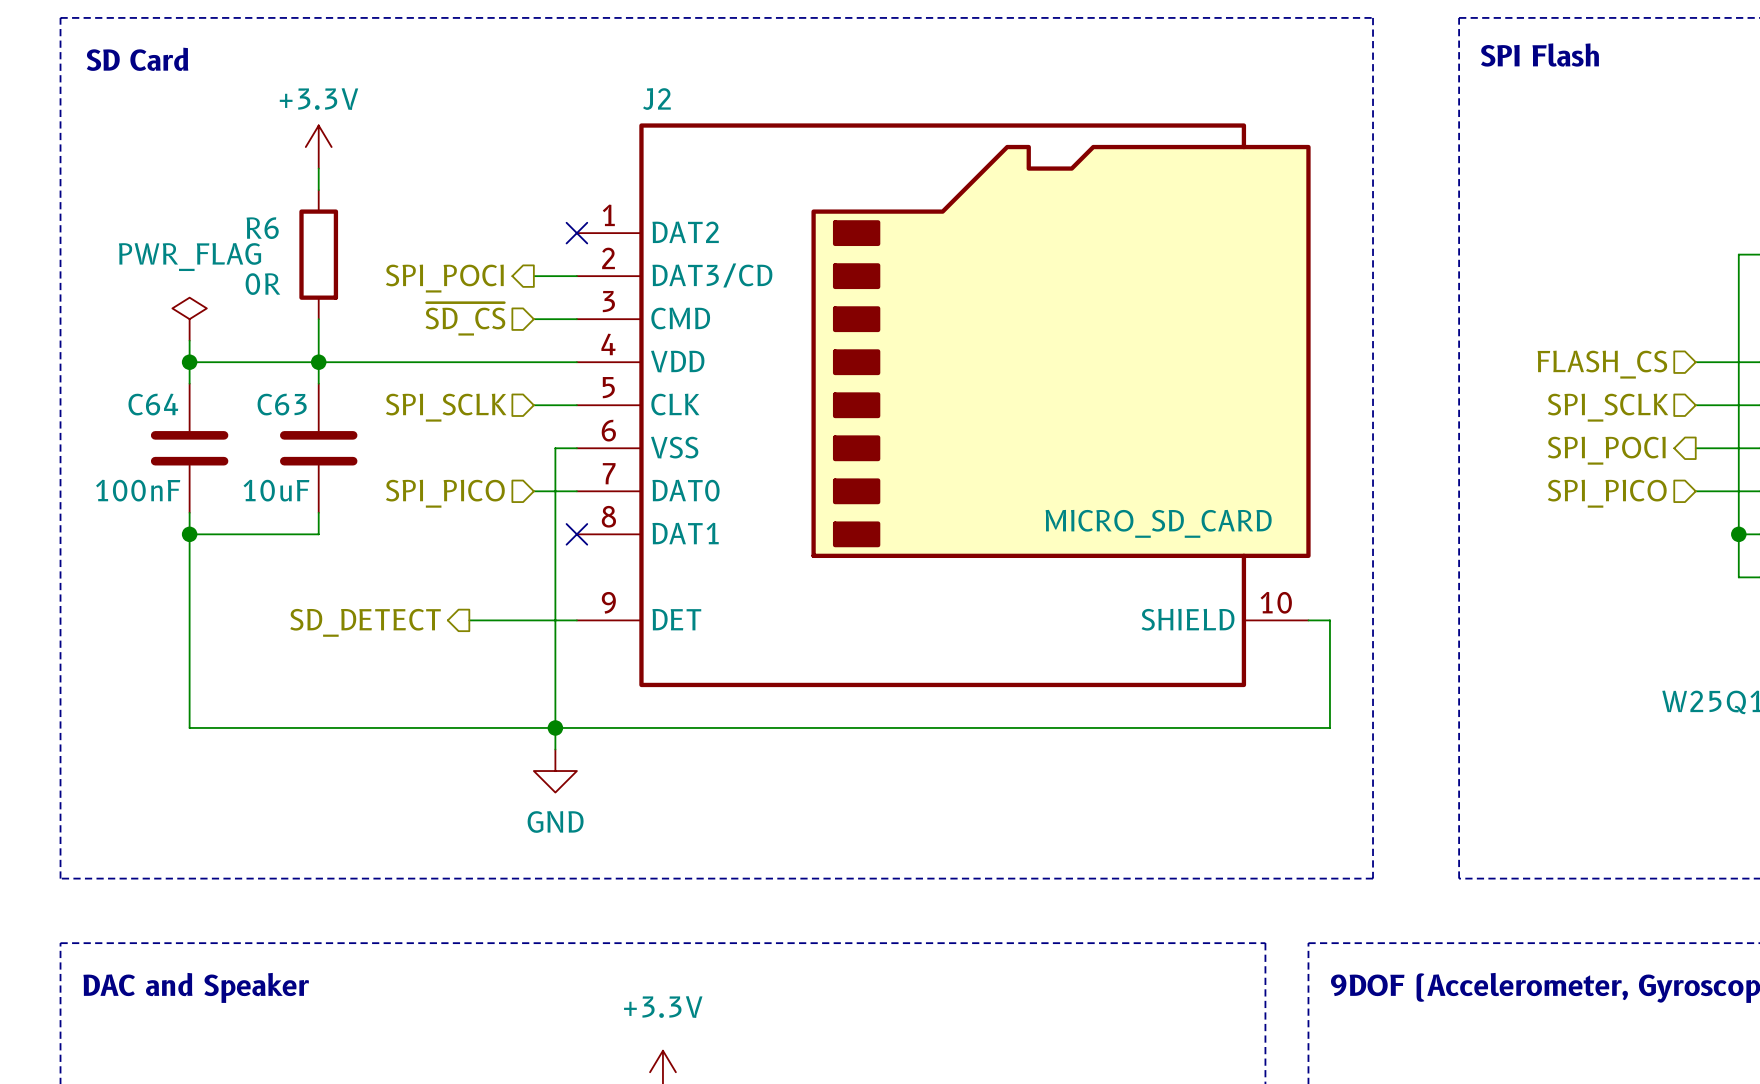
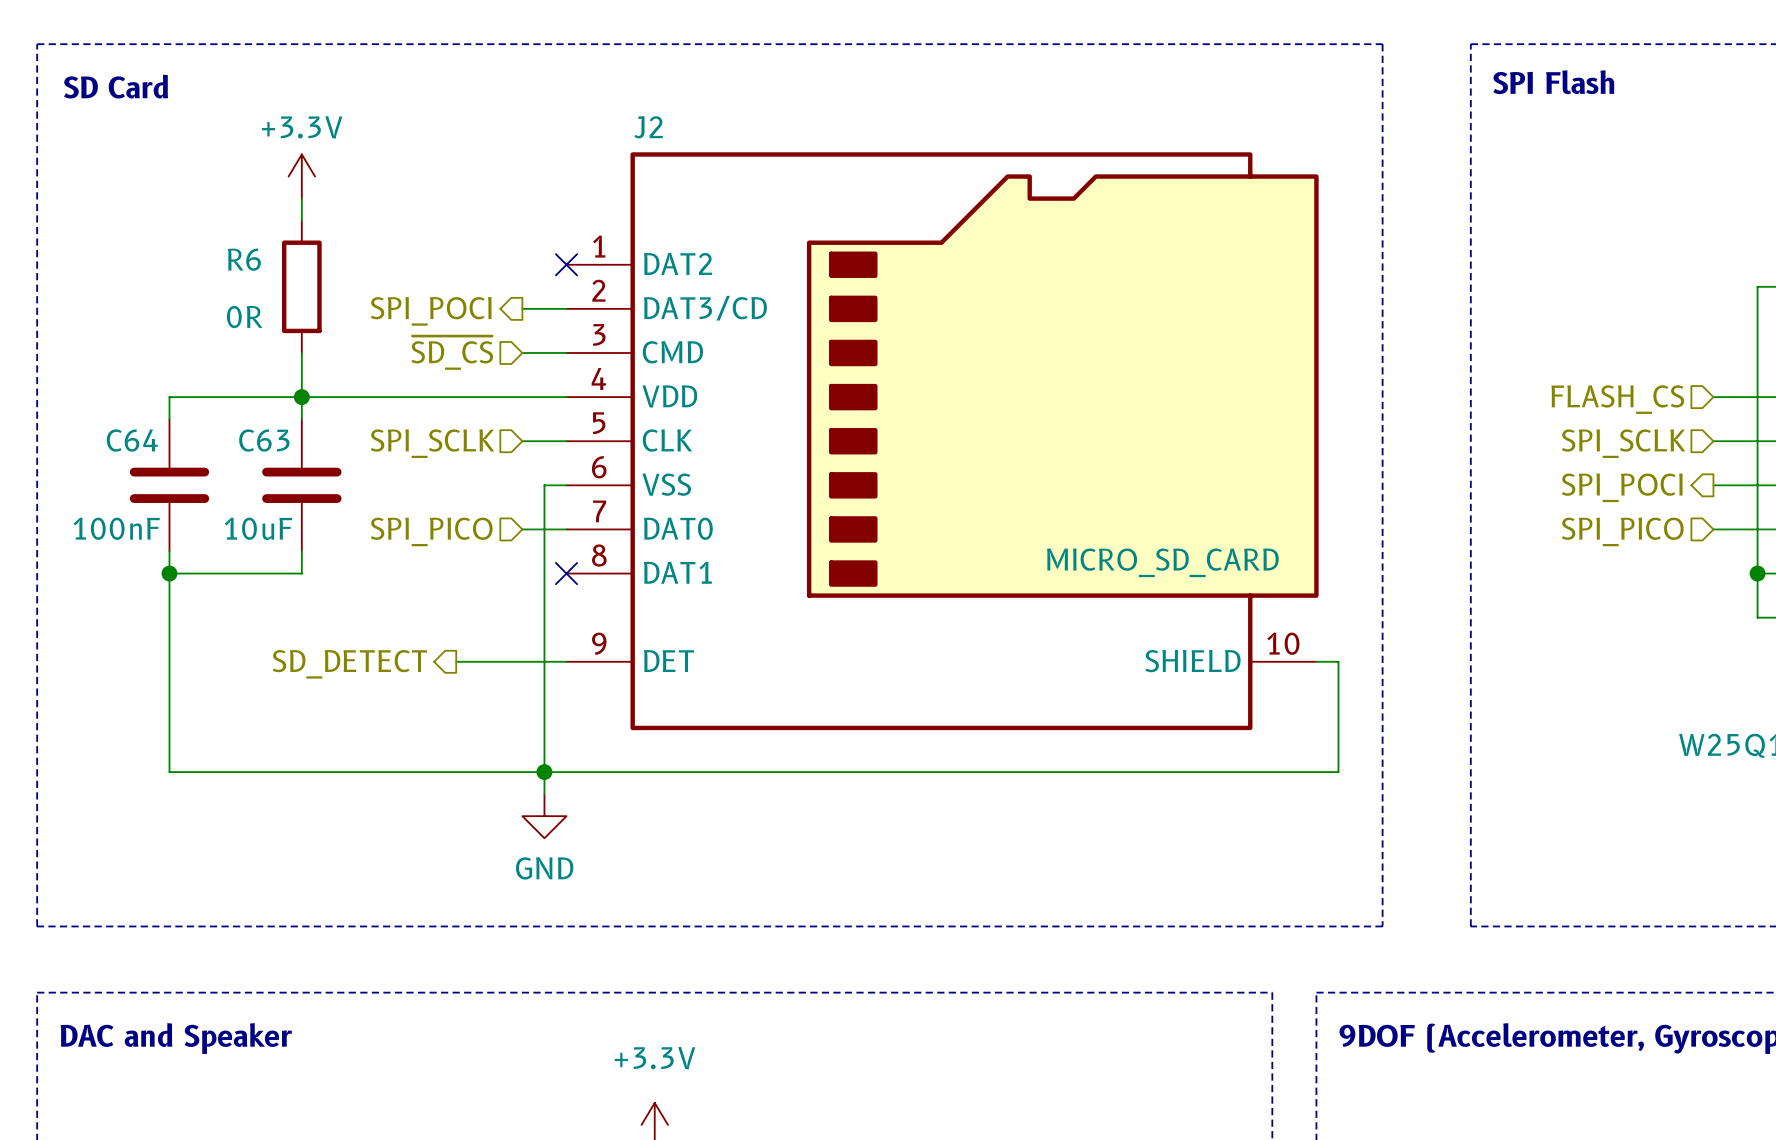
power symbol: PWR_FLAG (189, 319) -> none
wire: (189, 340) (189, 362) -> none
junction: (189, 362) -> none

